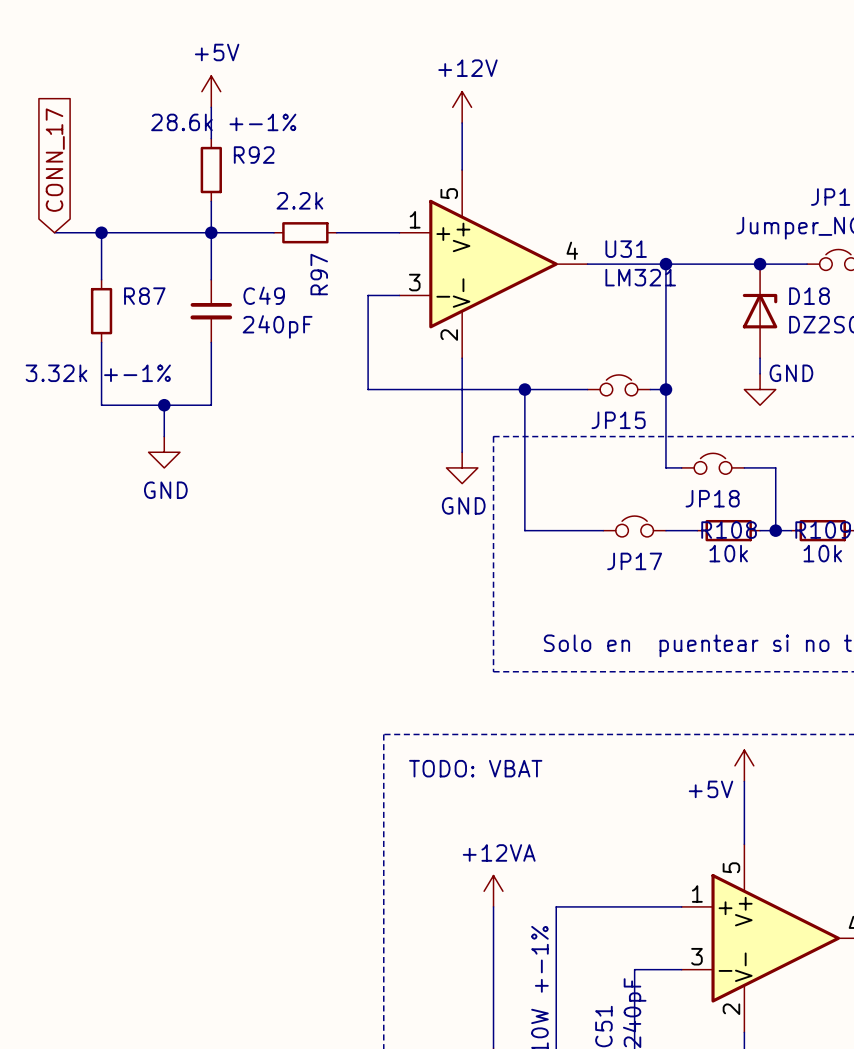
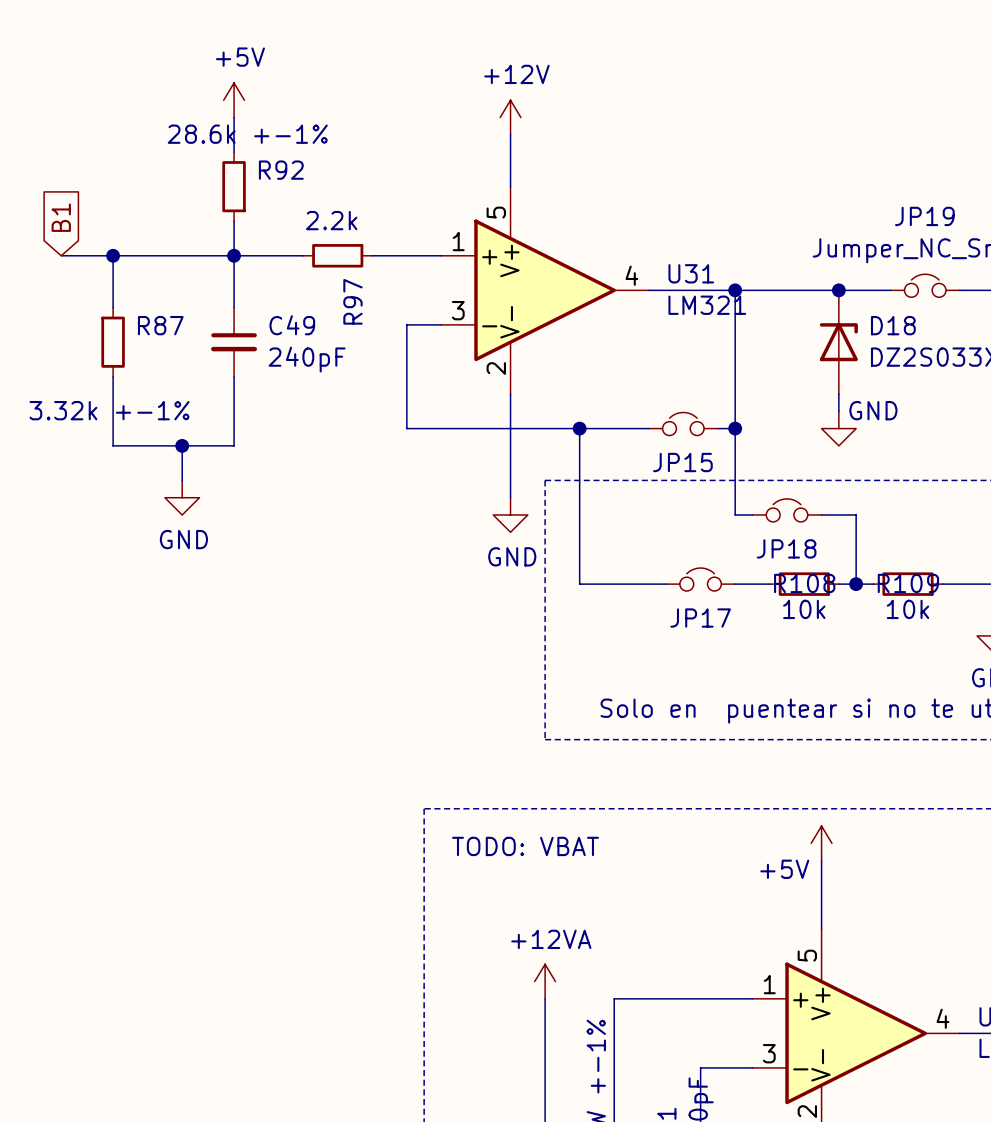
global label: CONN_17 (55, 160) -> B1 (61, 217)

